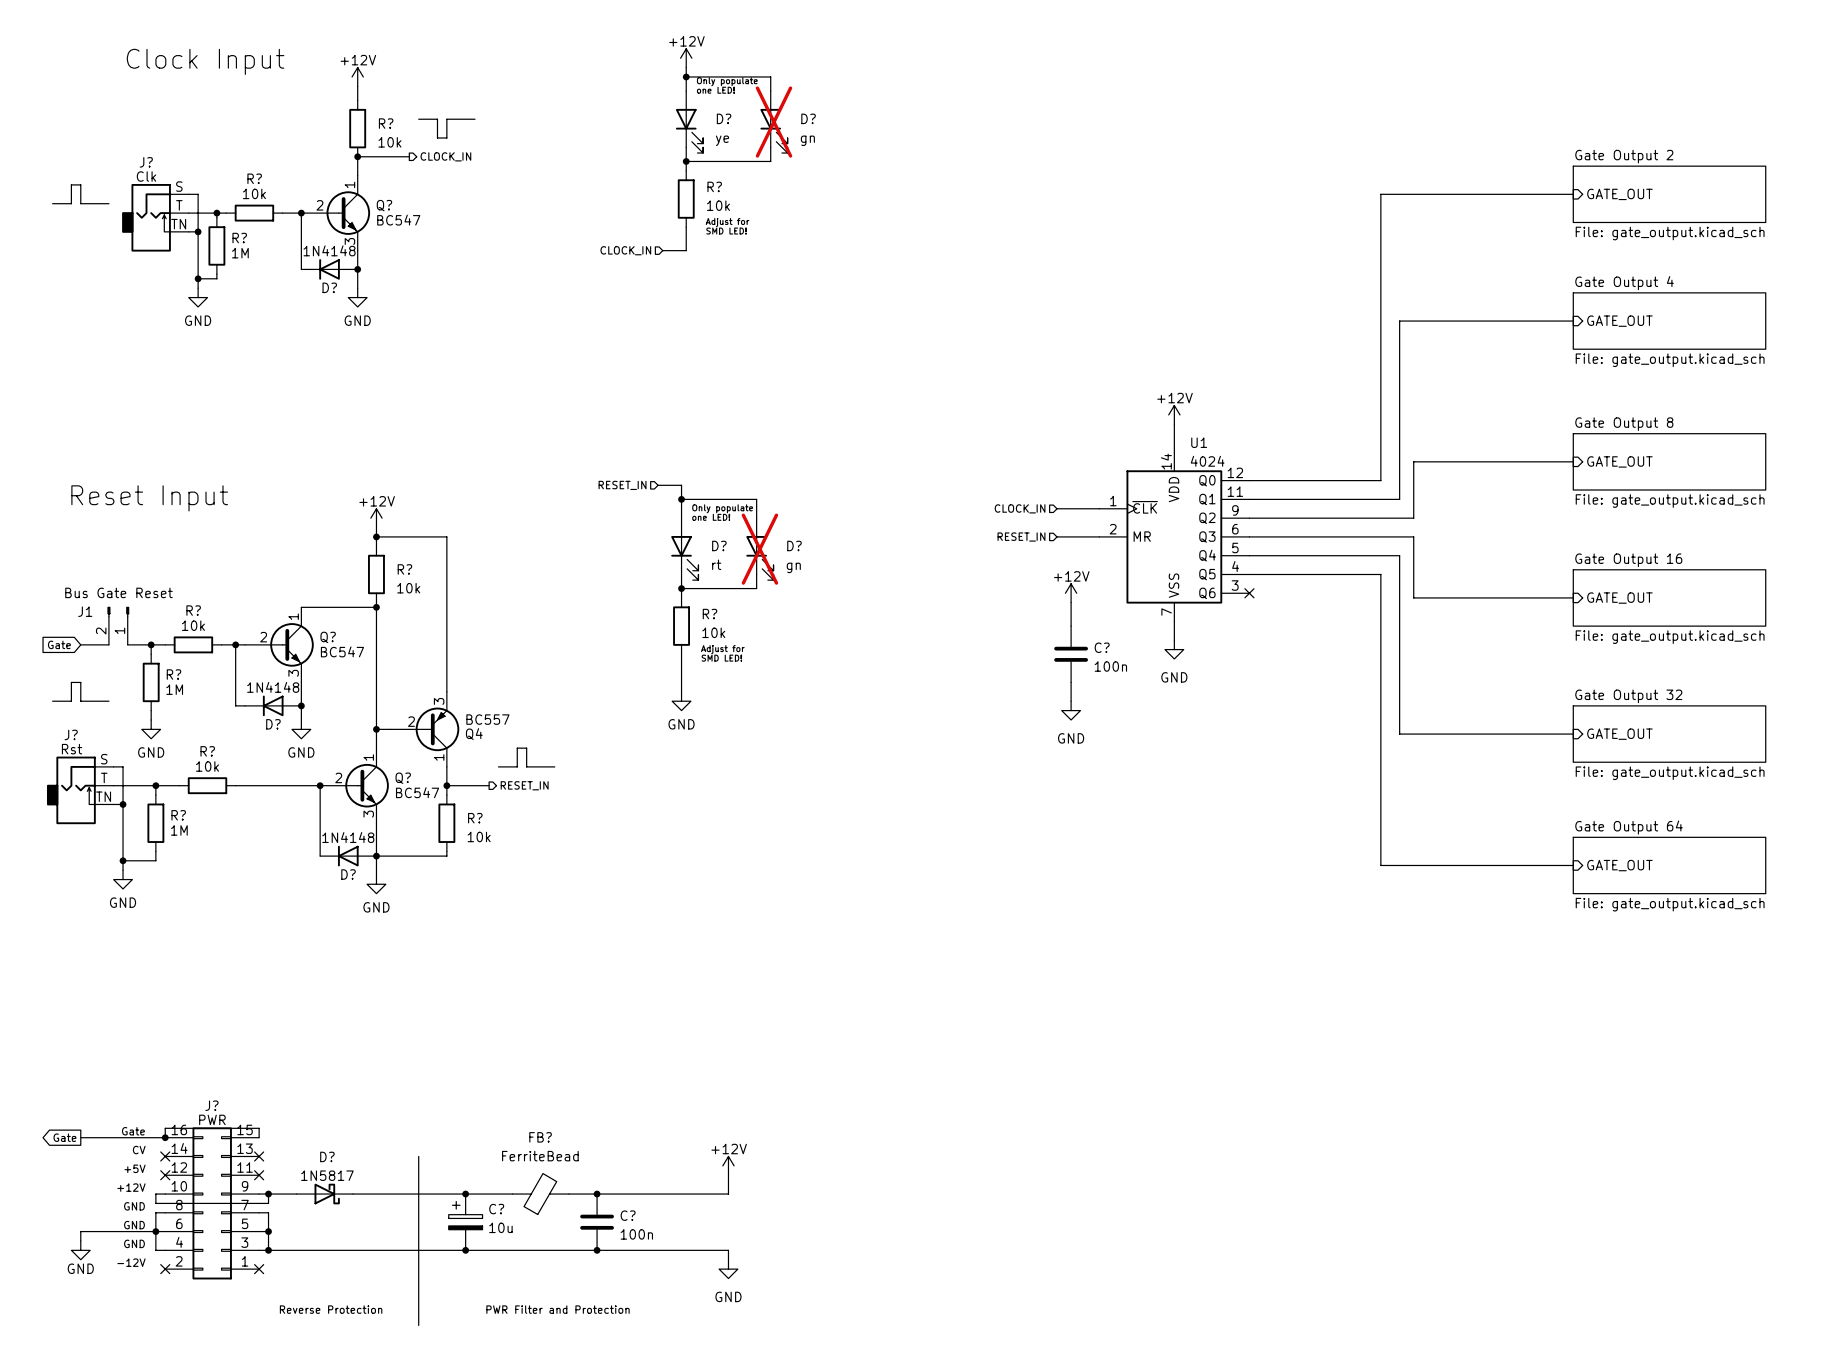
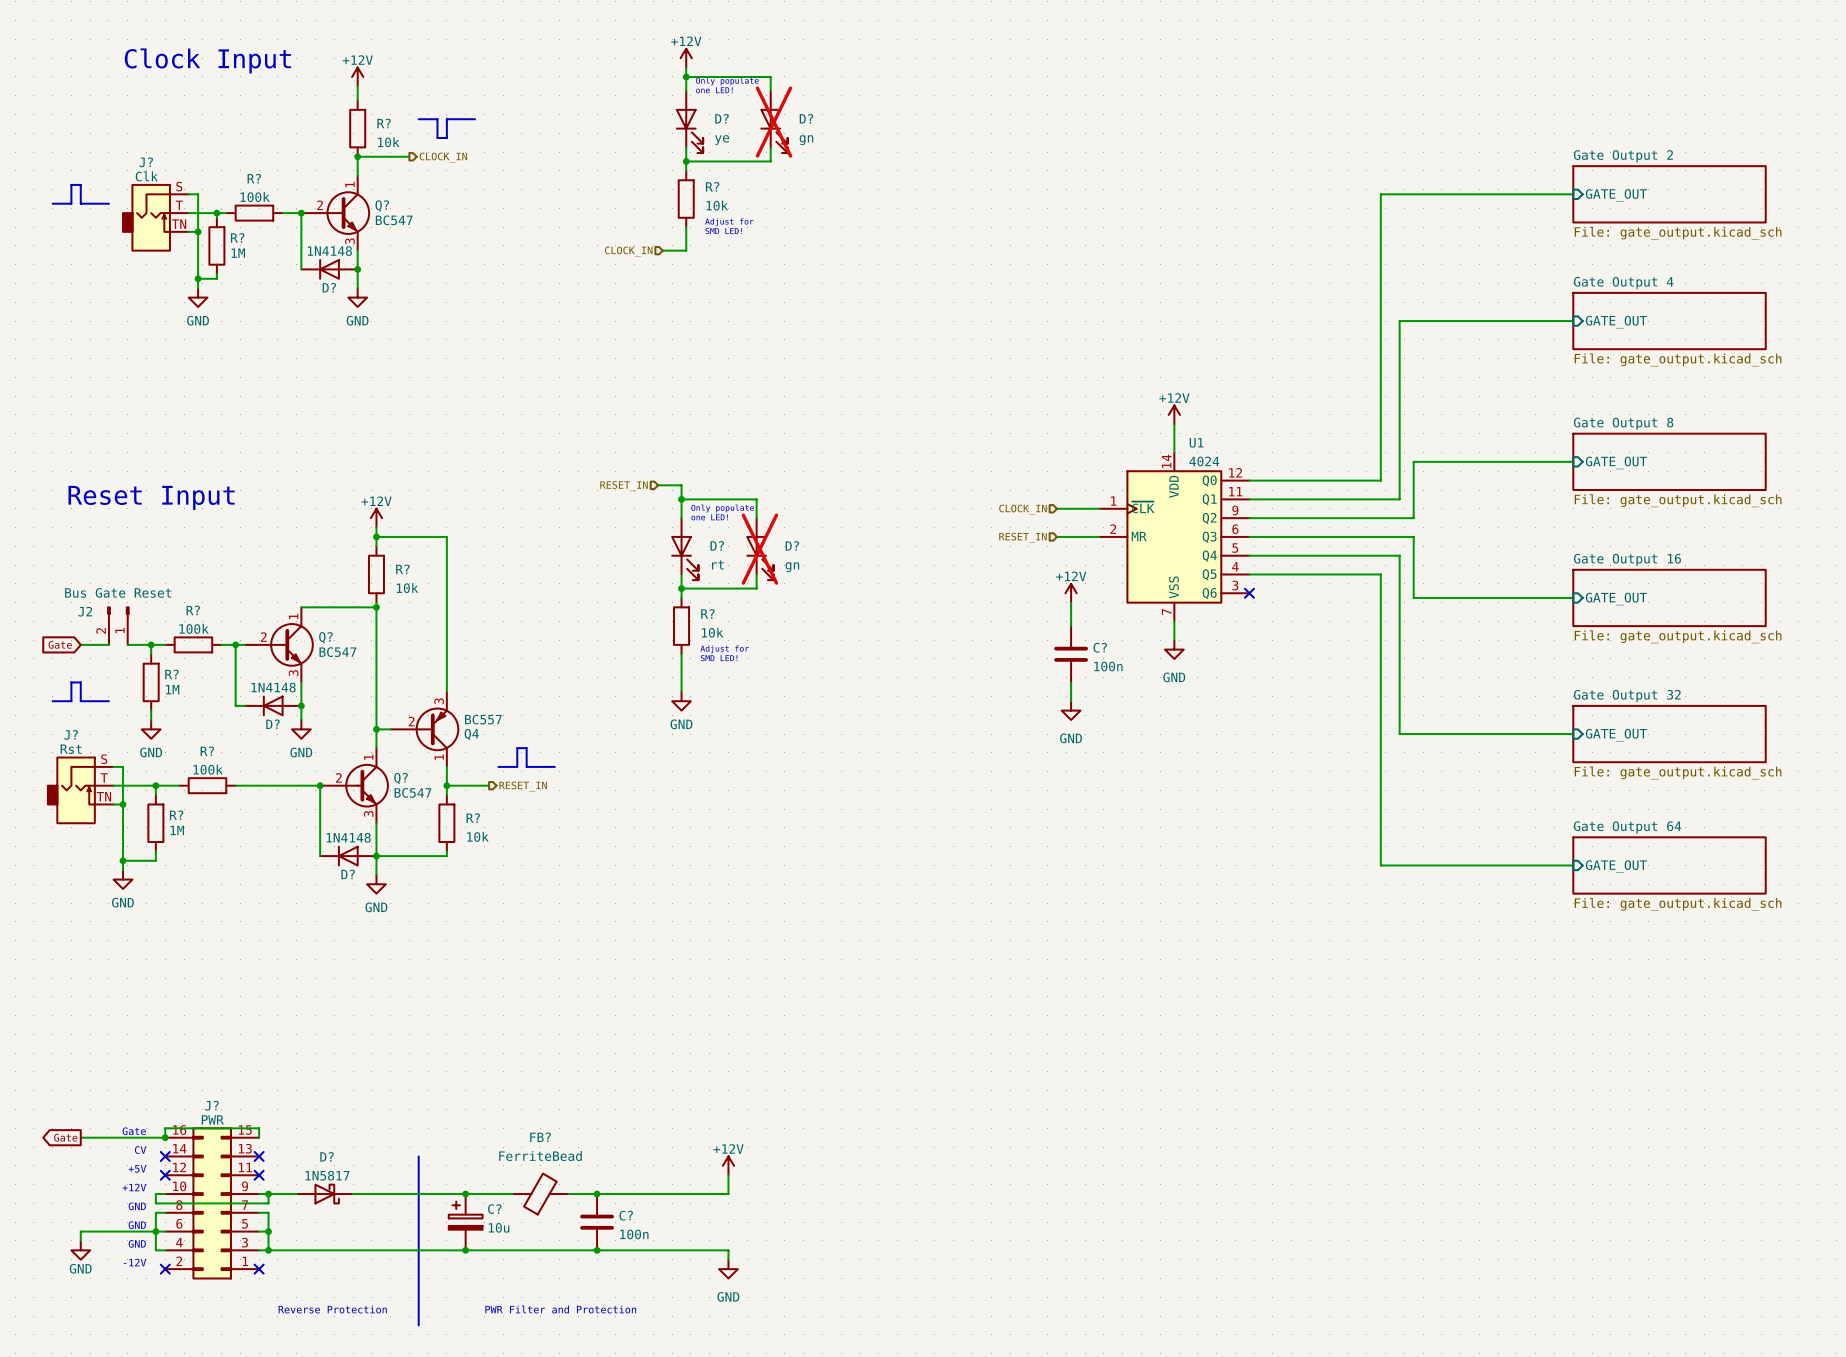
R? value: 10k (254, 193) -> 100k (255, 197)
J1 name: J1 (85, 611) -> J2 (85, 611)
R? value: 10k (193, 625) -> 100k (194, 628)
R? value: 10k (207, 766) -> 100k (208, 769)

